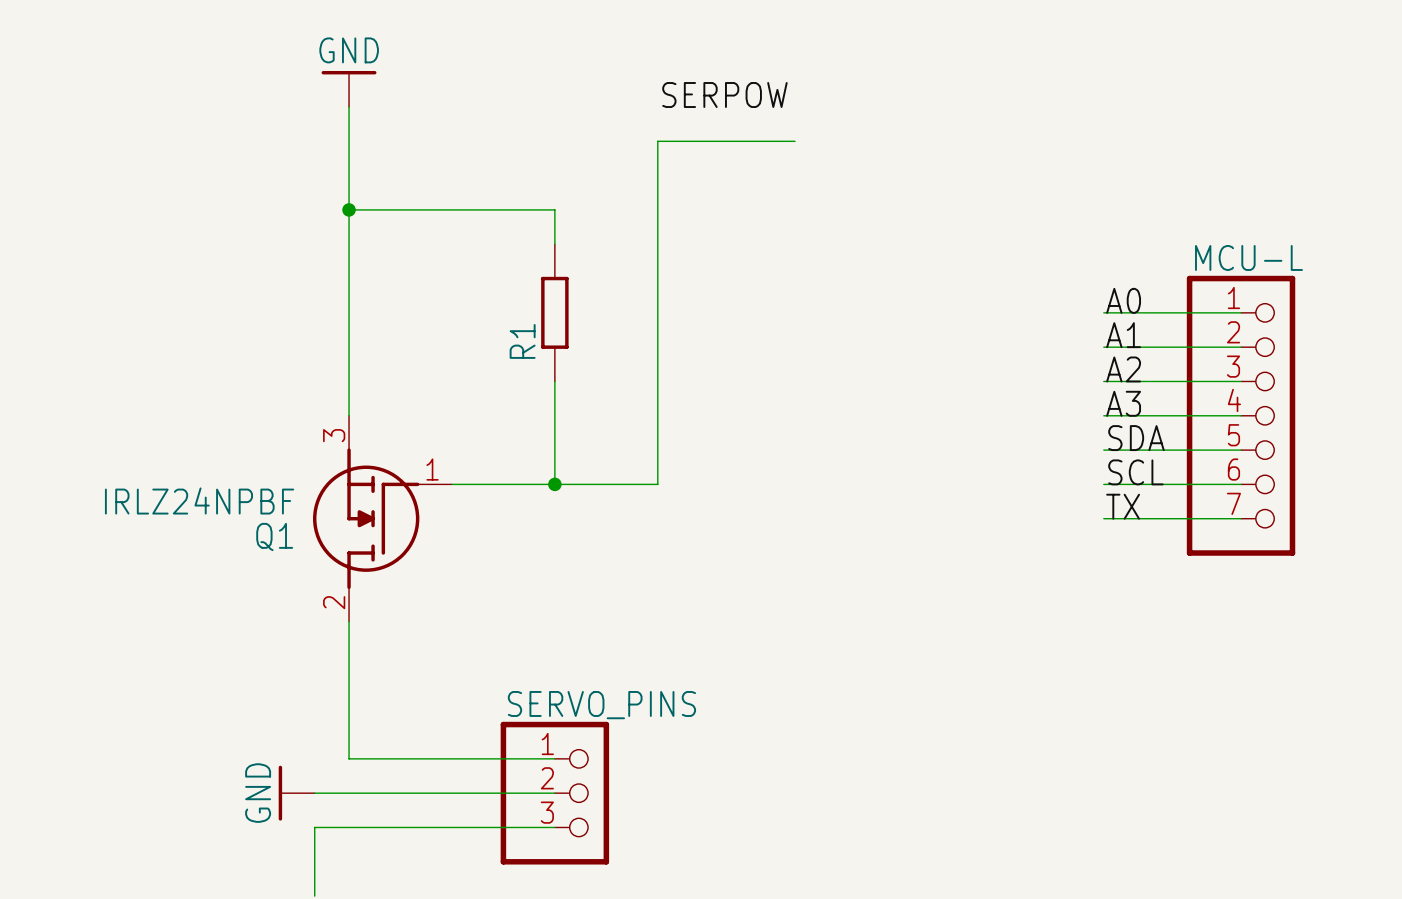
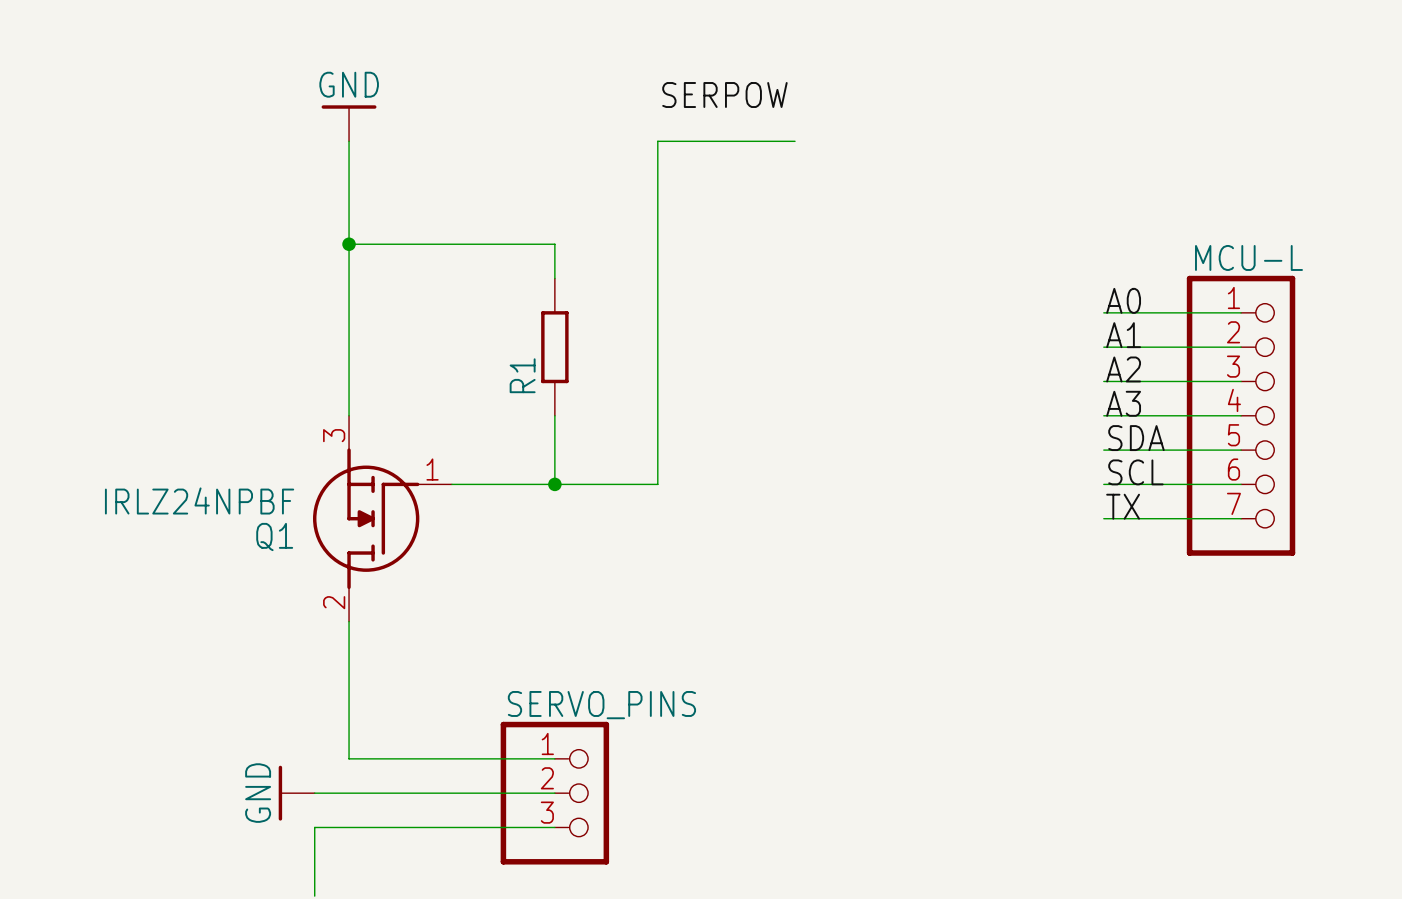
power symbol position: GND (349, 89) -> GND (349, 123)
wire: (349, 209) (554, 209) (554, 244) -> (349, 244) (554, 244) (554, 278)
junction position: (349, 209) -> (349, 244)
R1 position: (554, 312) -> (554, 347)

